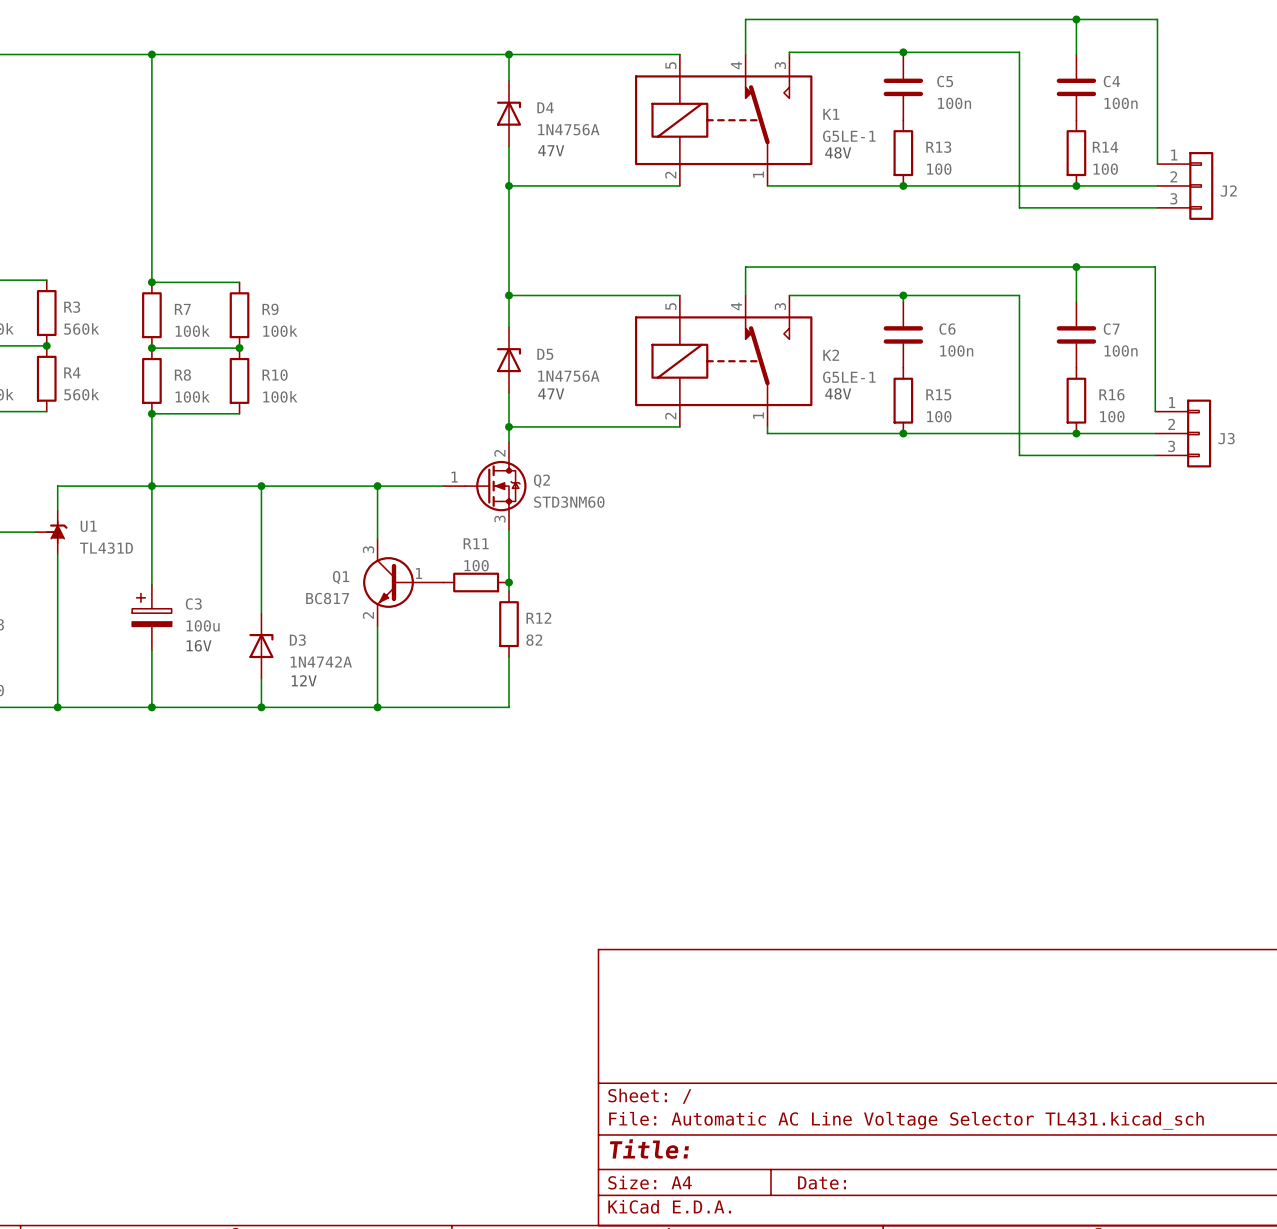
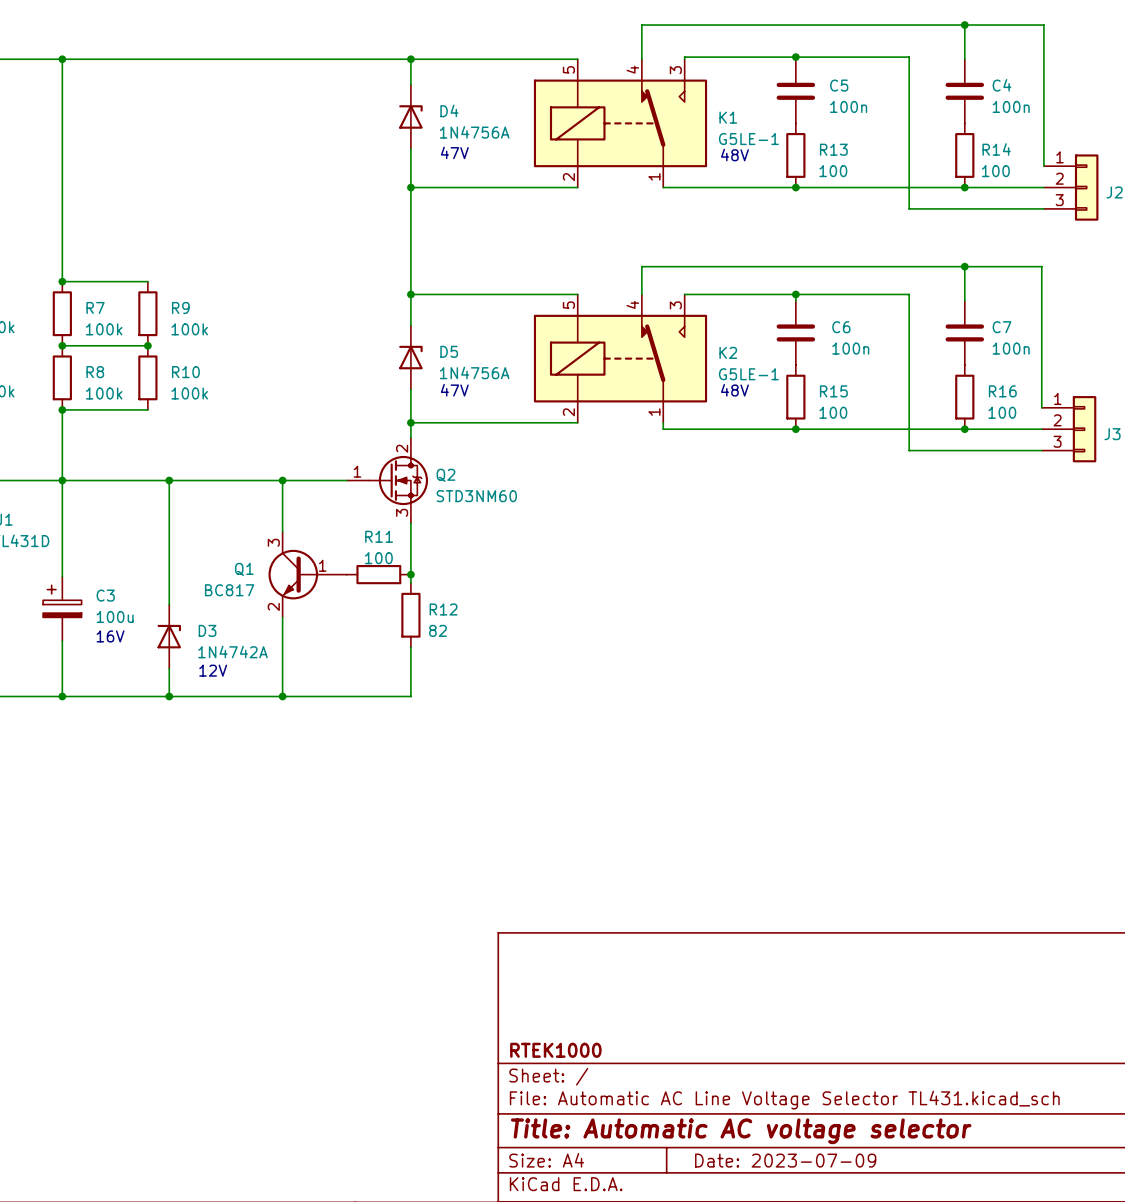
title block: none -> RTEK1000 (555, 1050)
title block: Title: (649, 1149) -> Title: Automatic AC voltage selector (741, 1131)
title block: Date: (822, 1182) -> Date: 2023-07-09 (785, 1160)

